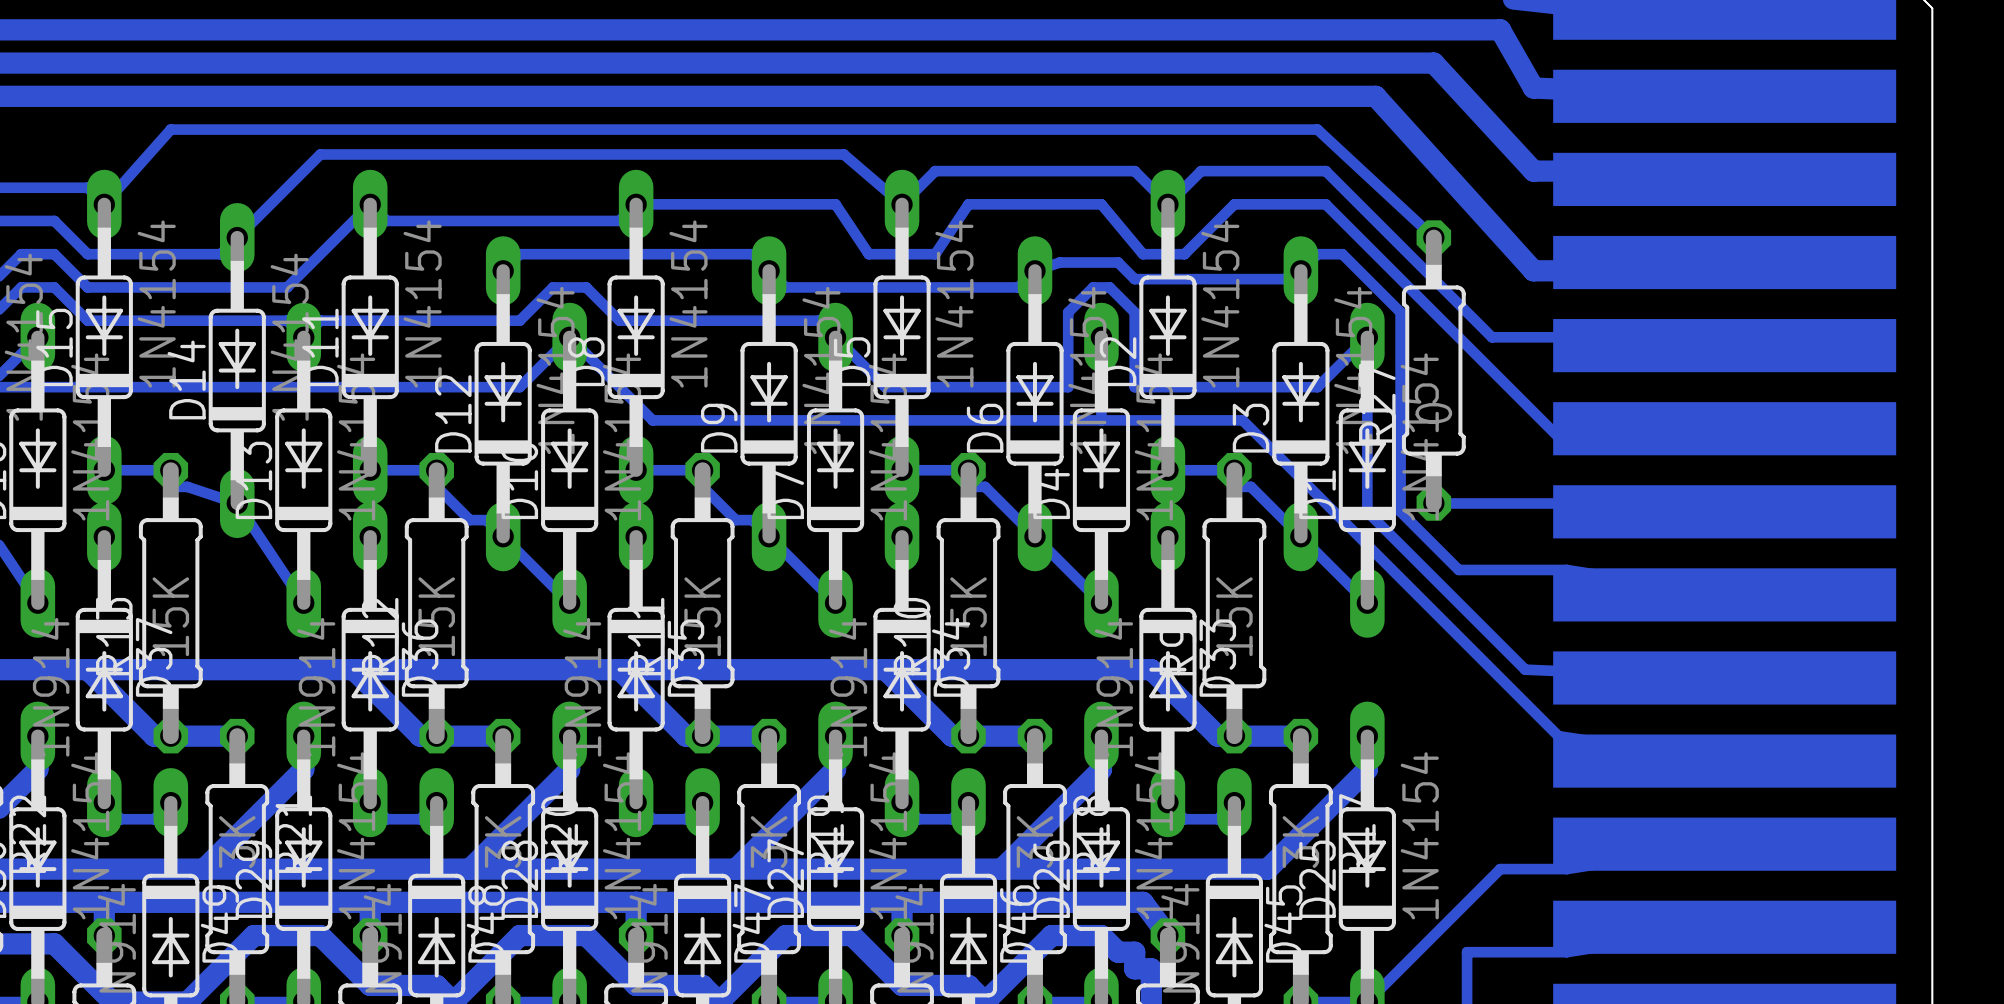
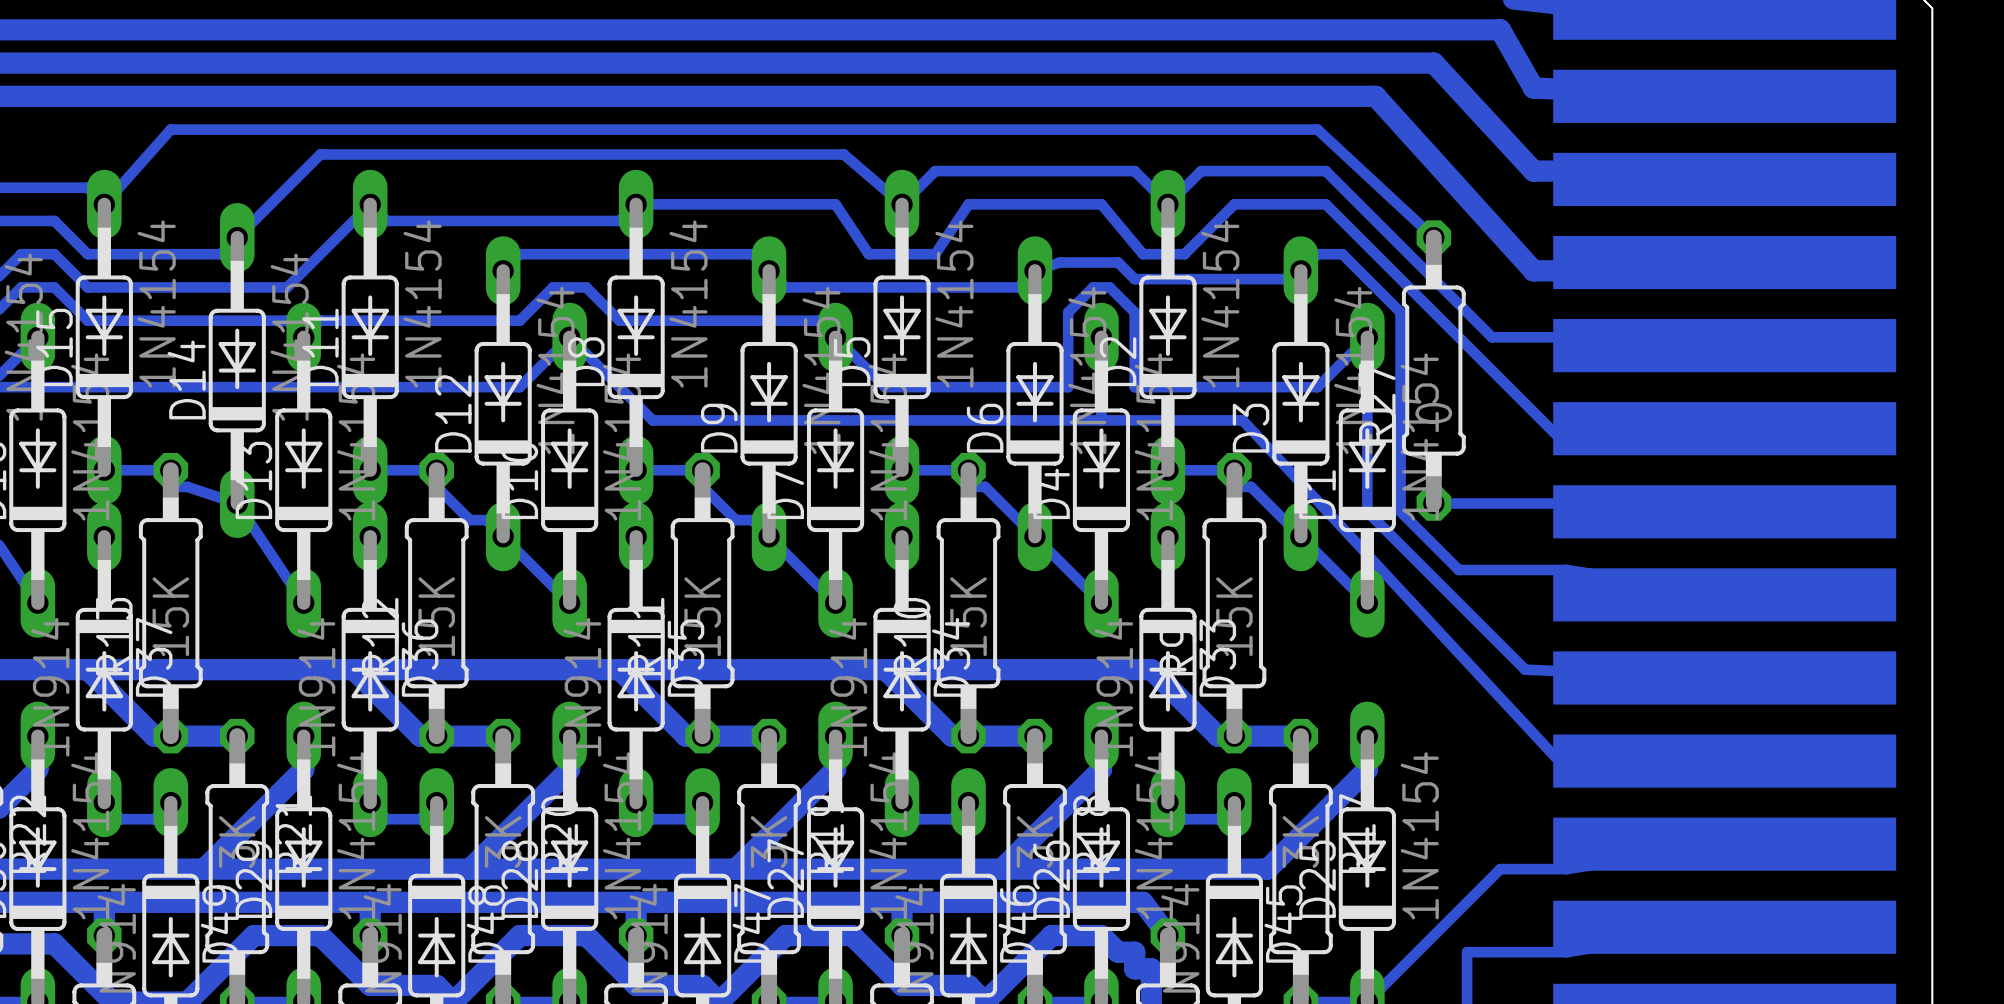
bottom track: (1242, 420) (1558, 736) (1724, 761) -> (1242, 420) (1566, 769) (1724, 761)

